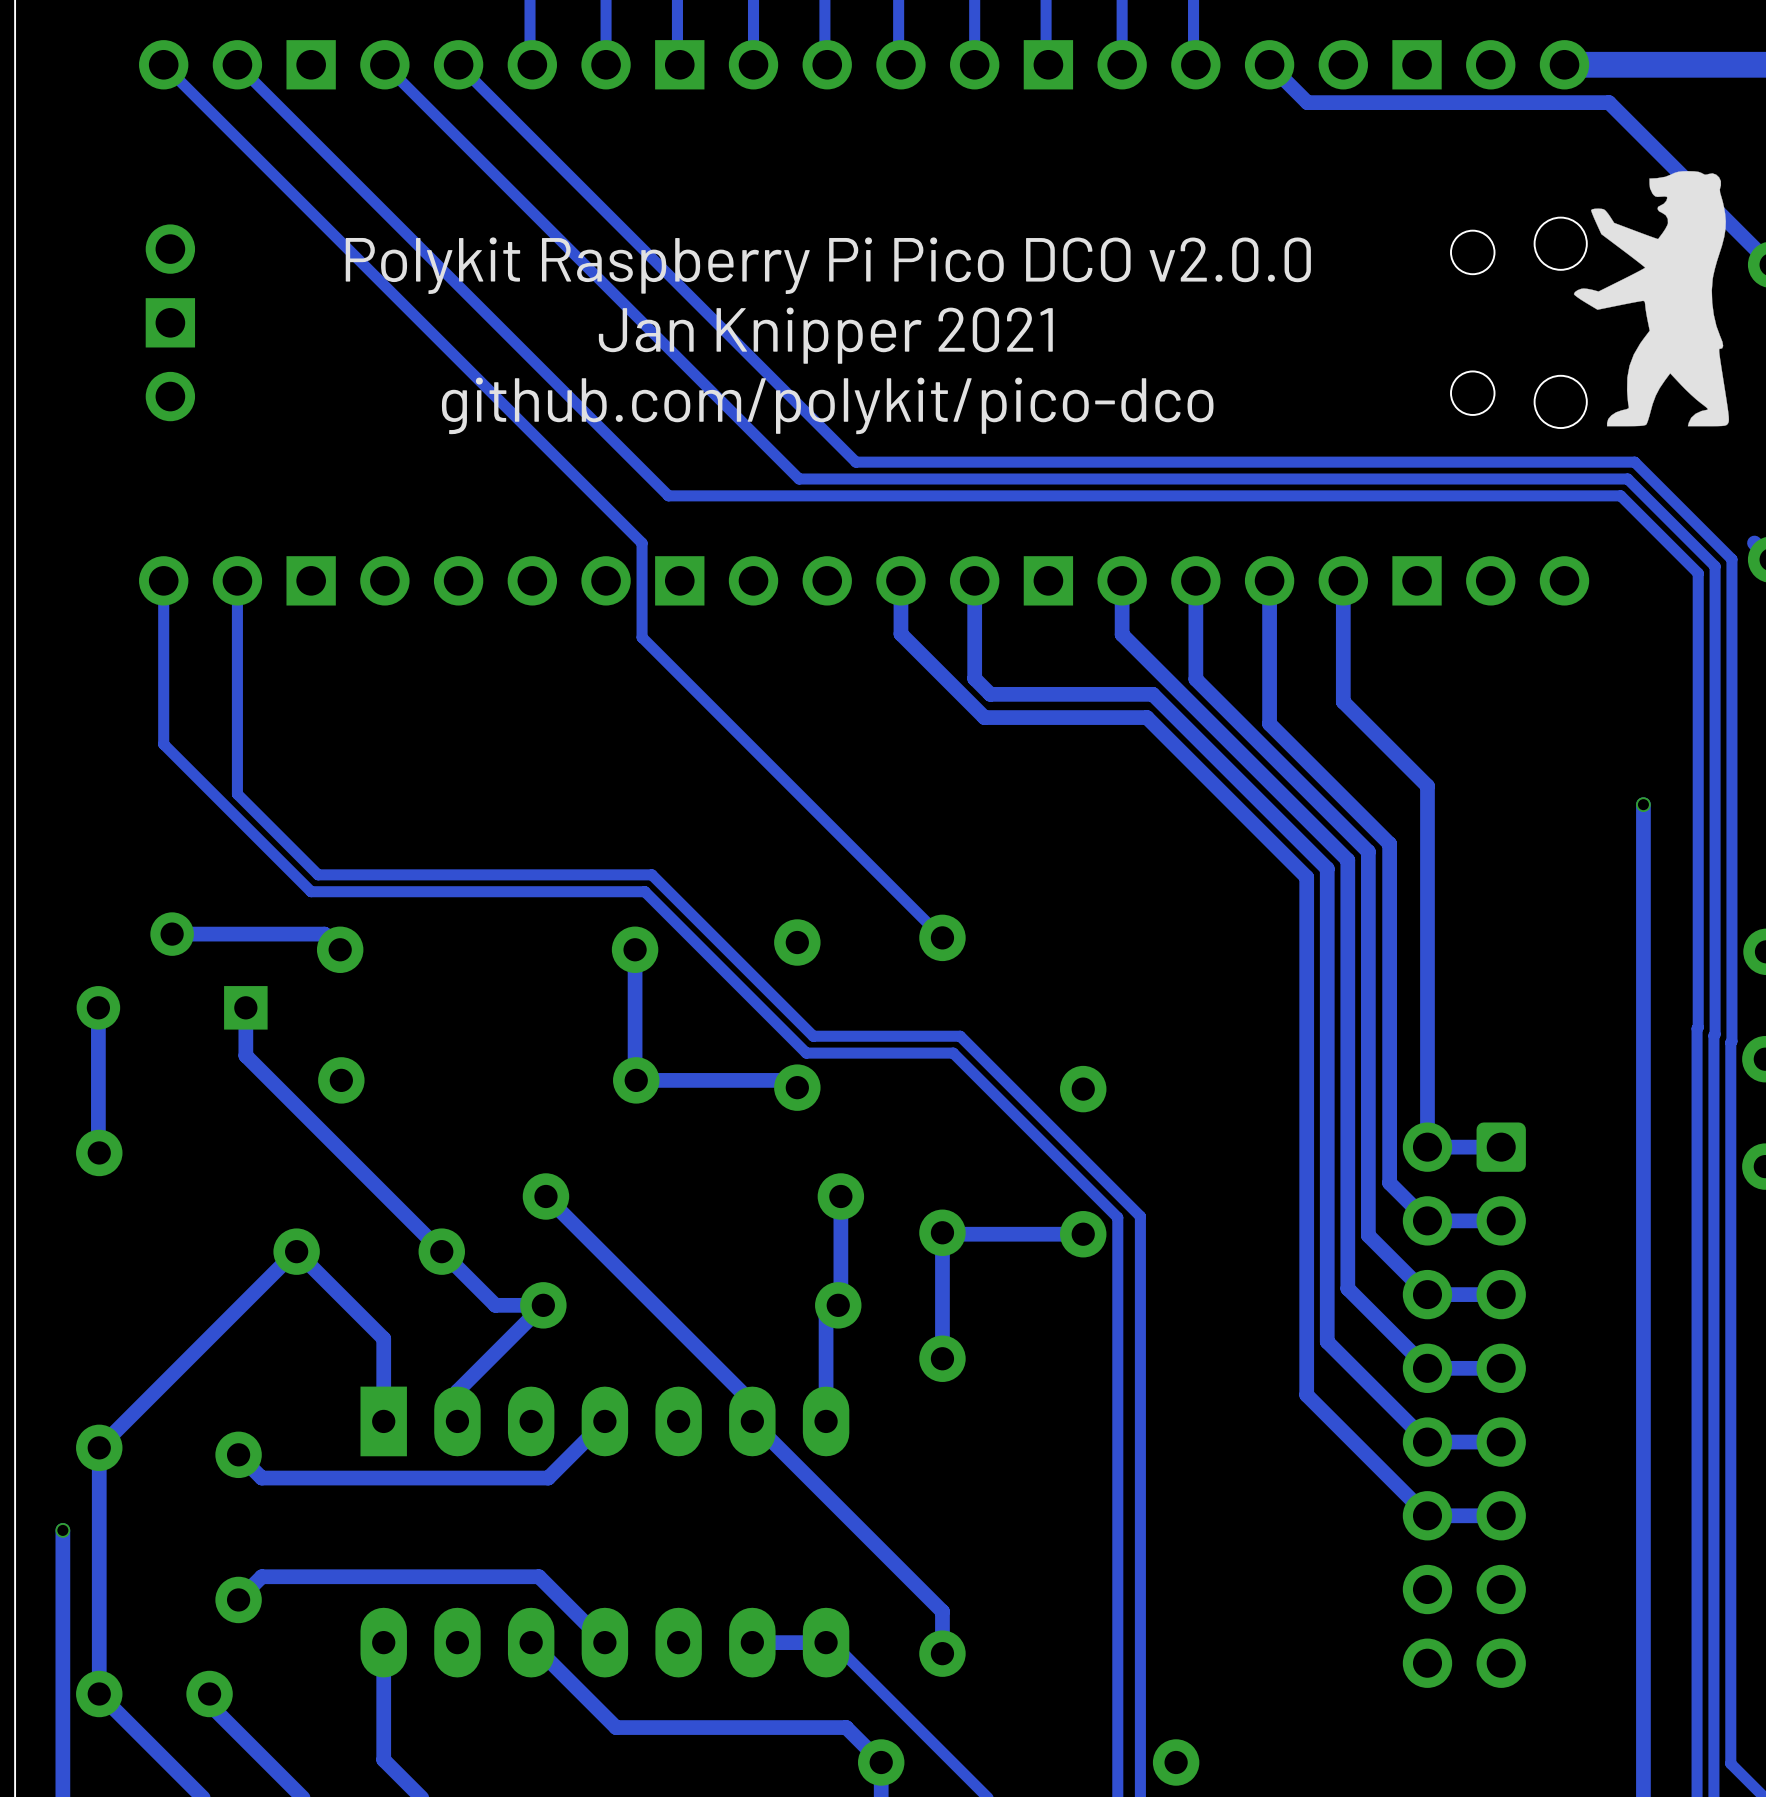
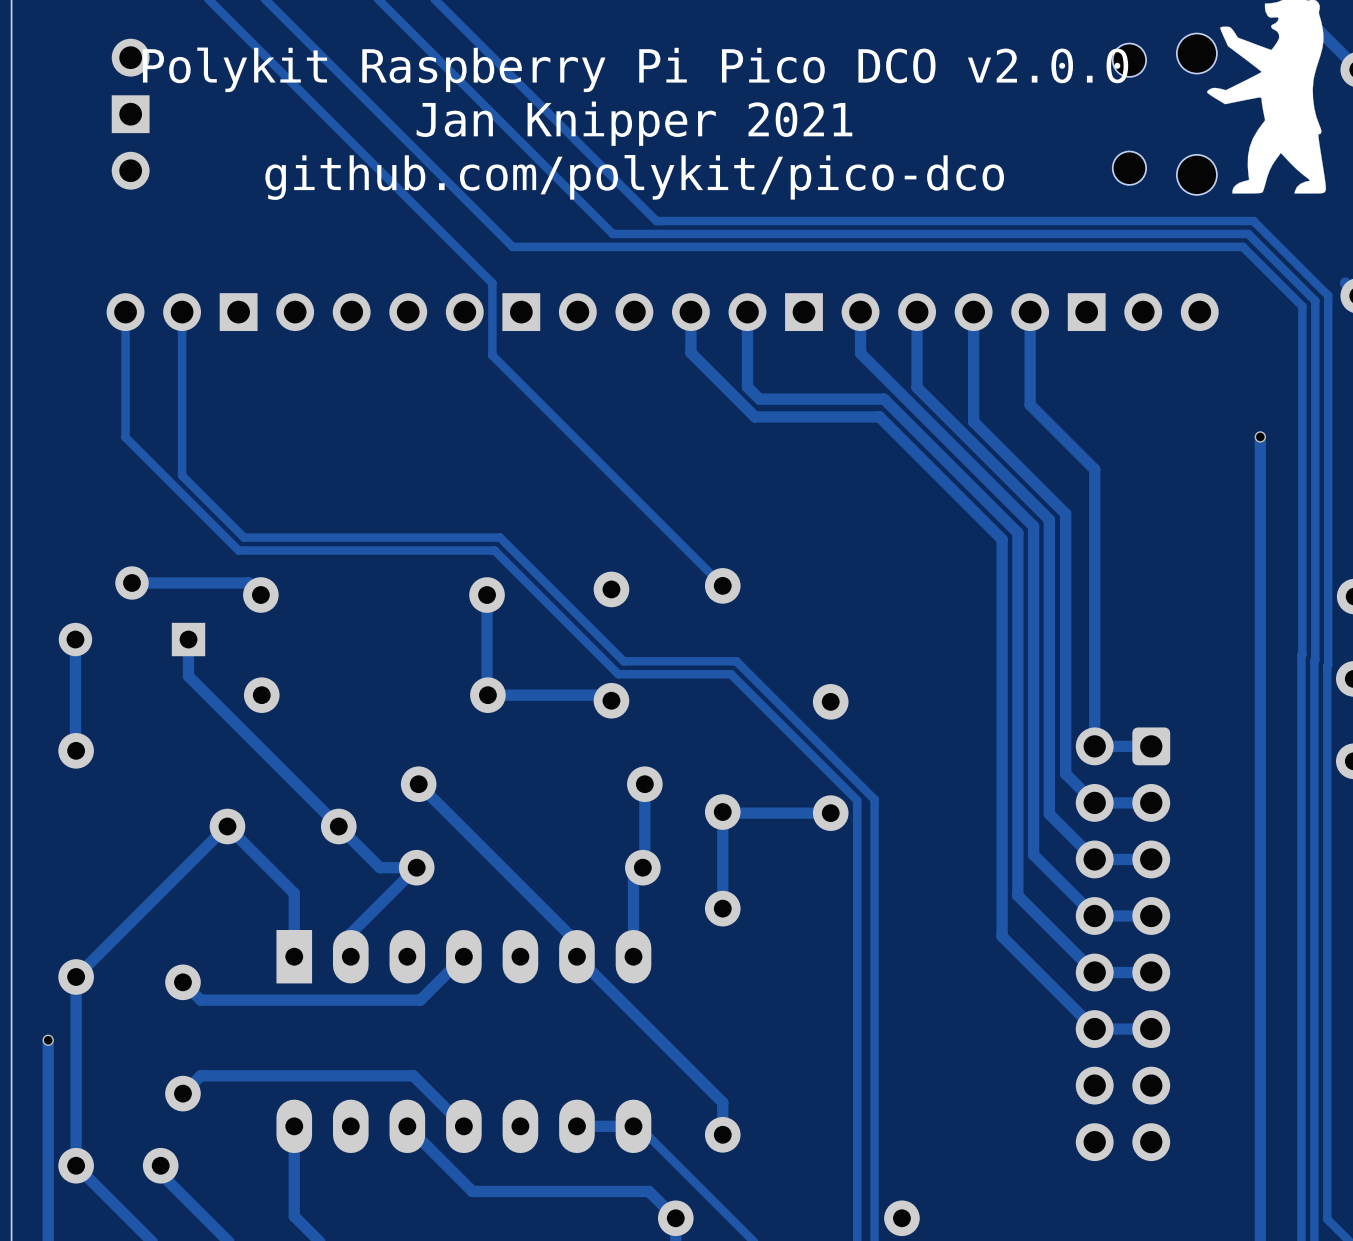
track: none -> (1260, 436) (1260, 483)
via position: (1643, 804) -> (1260, 436)

